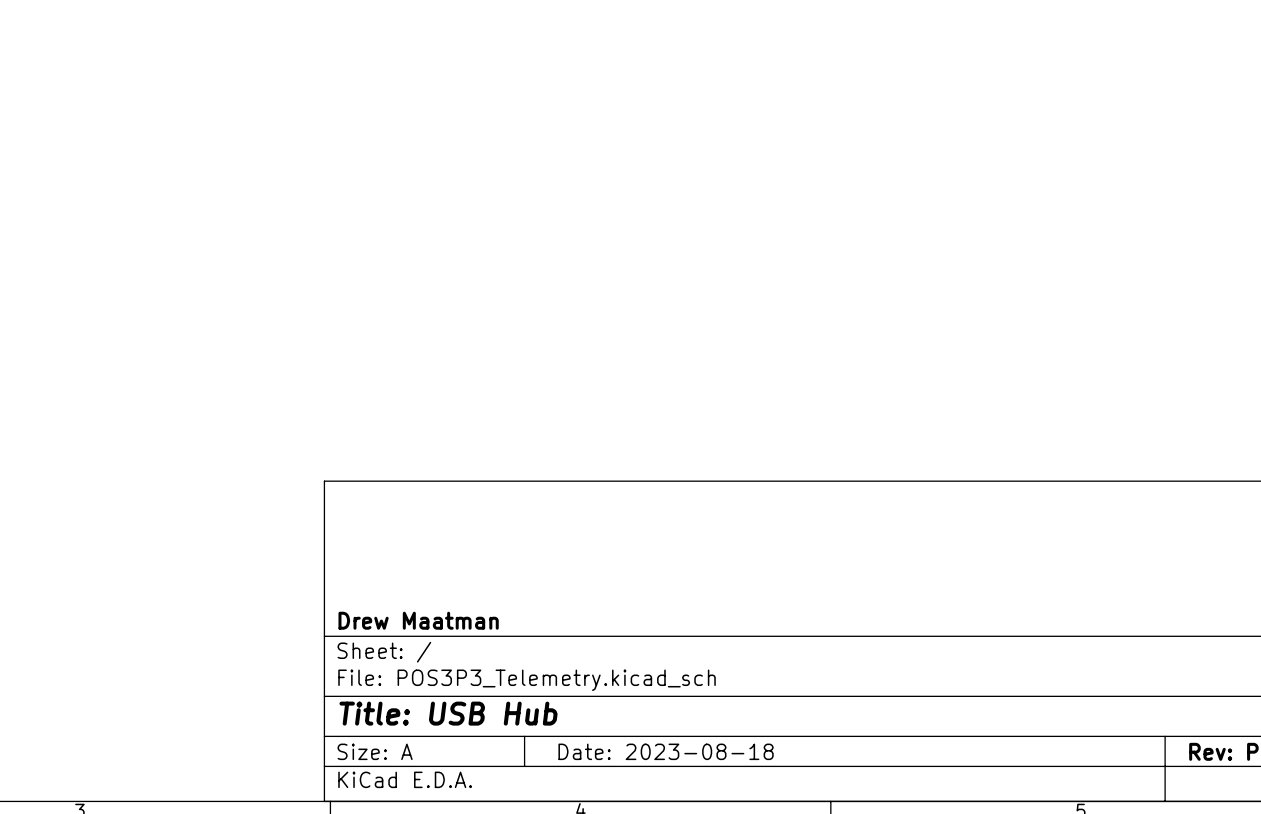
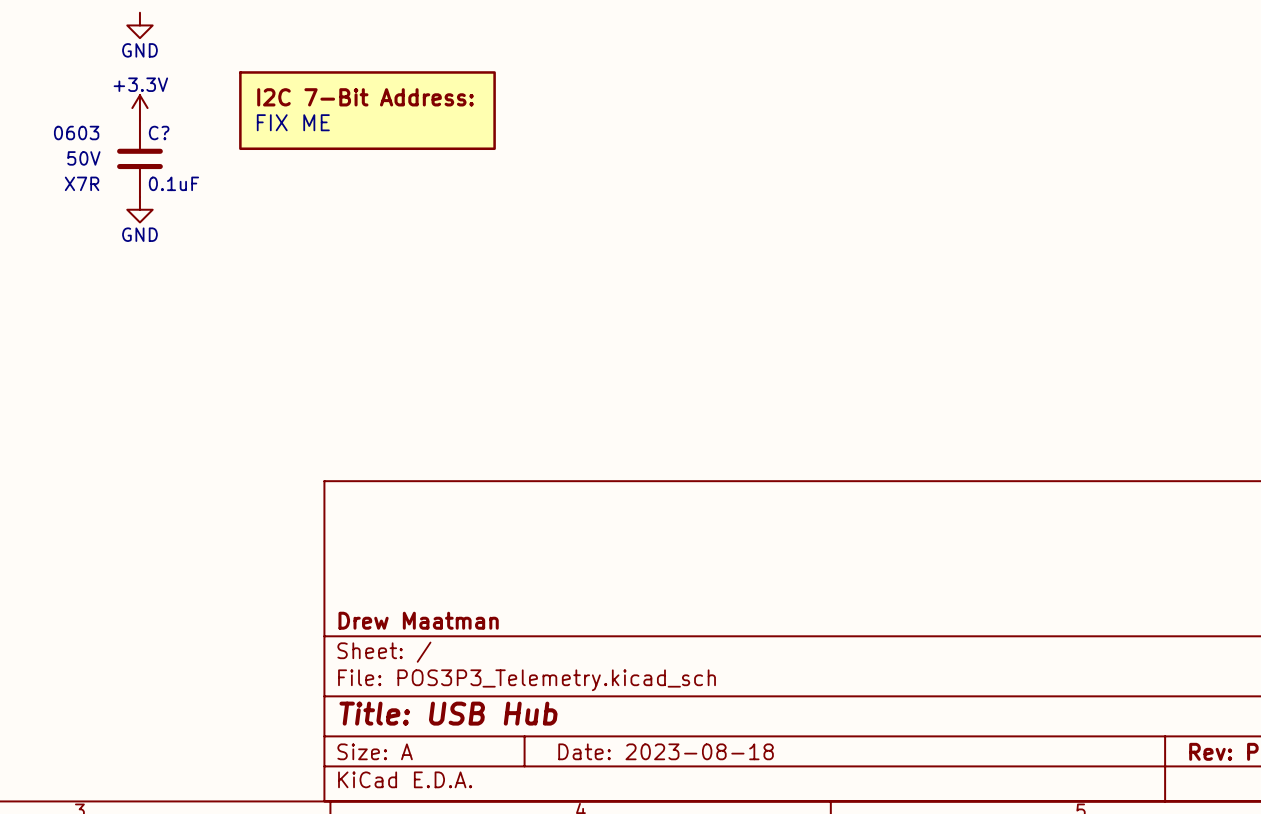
power symbol: none -> GND (139, 25)
power symbol: none -> +3.3V (139, 108)
part: none -> FIX ME (367, 110)
C?: none -> 0.1uF (139, 158)
power symbol: none -> GND (139, 209)

